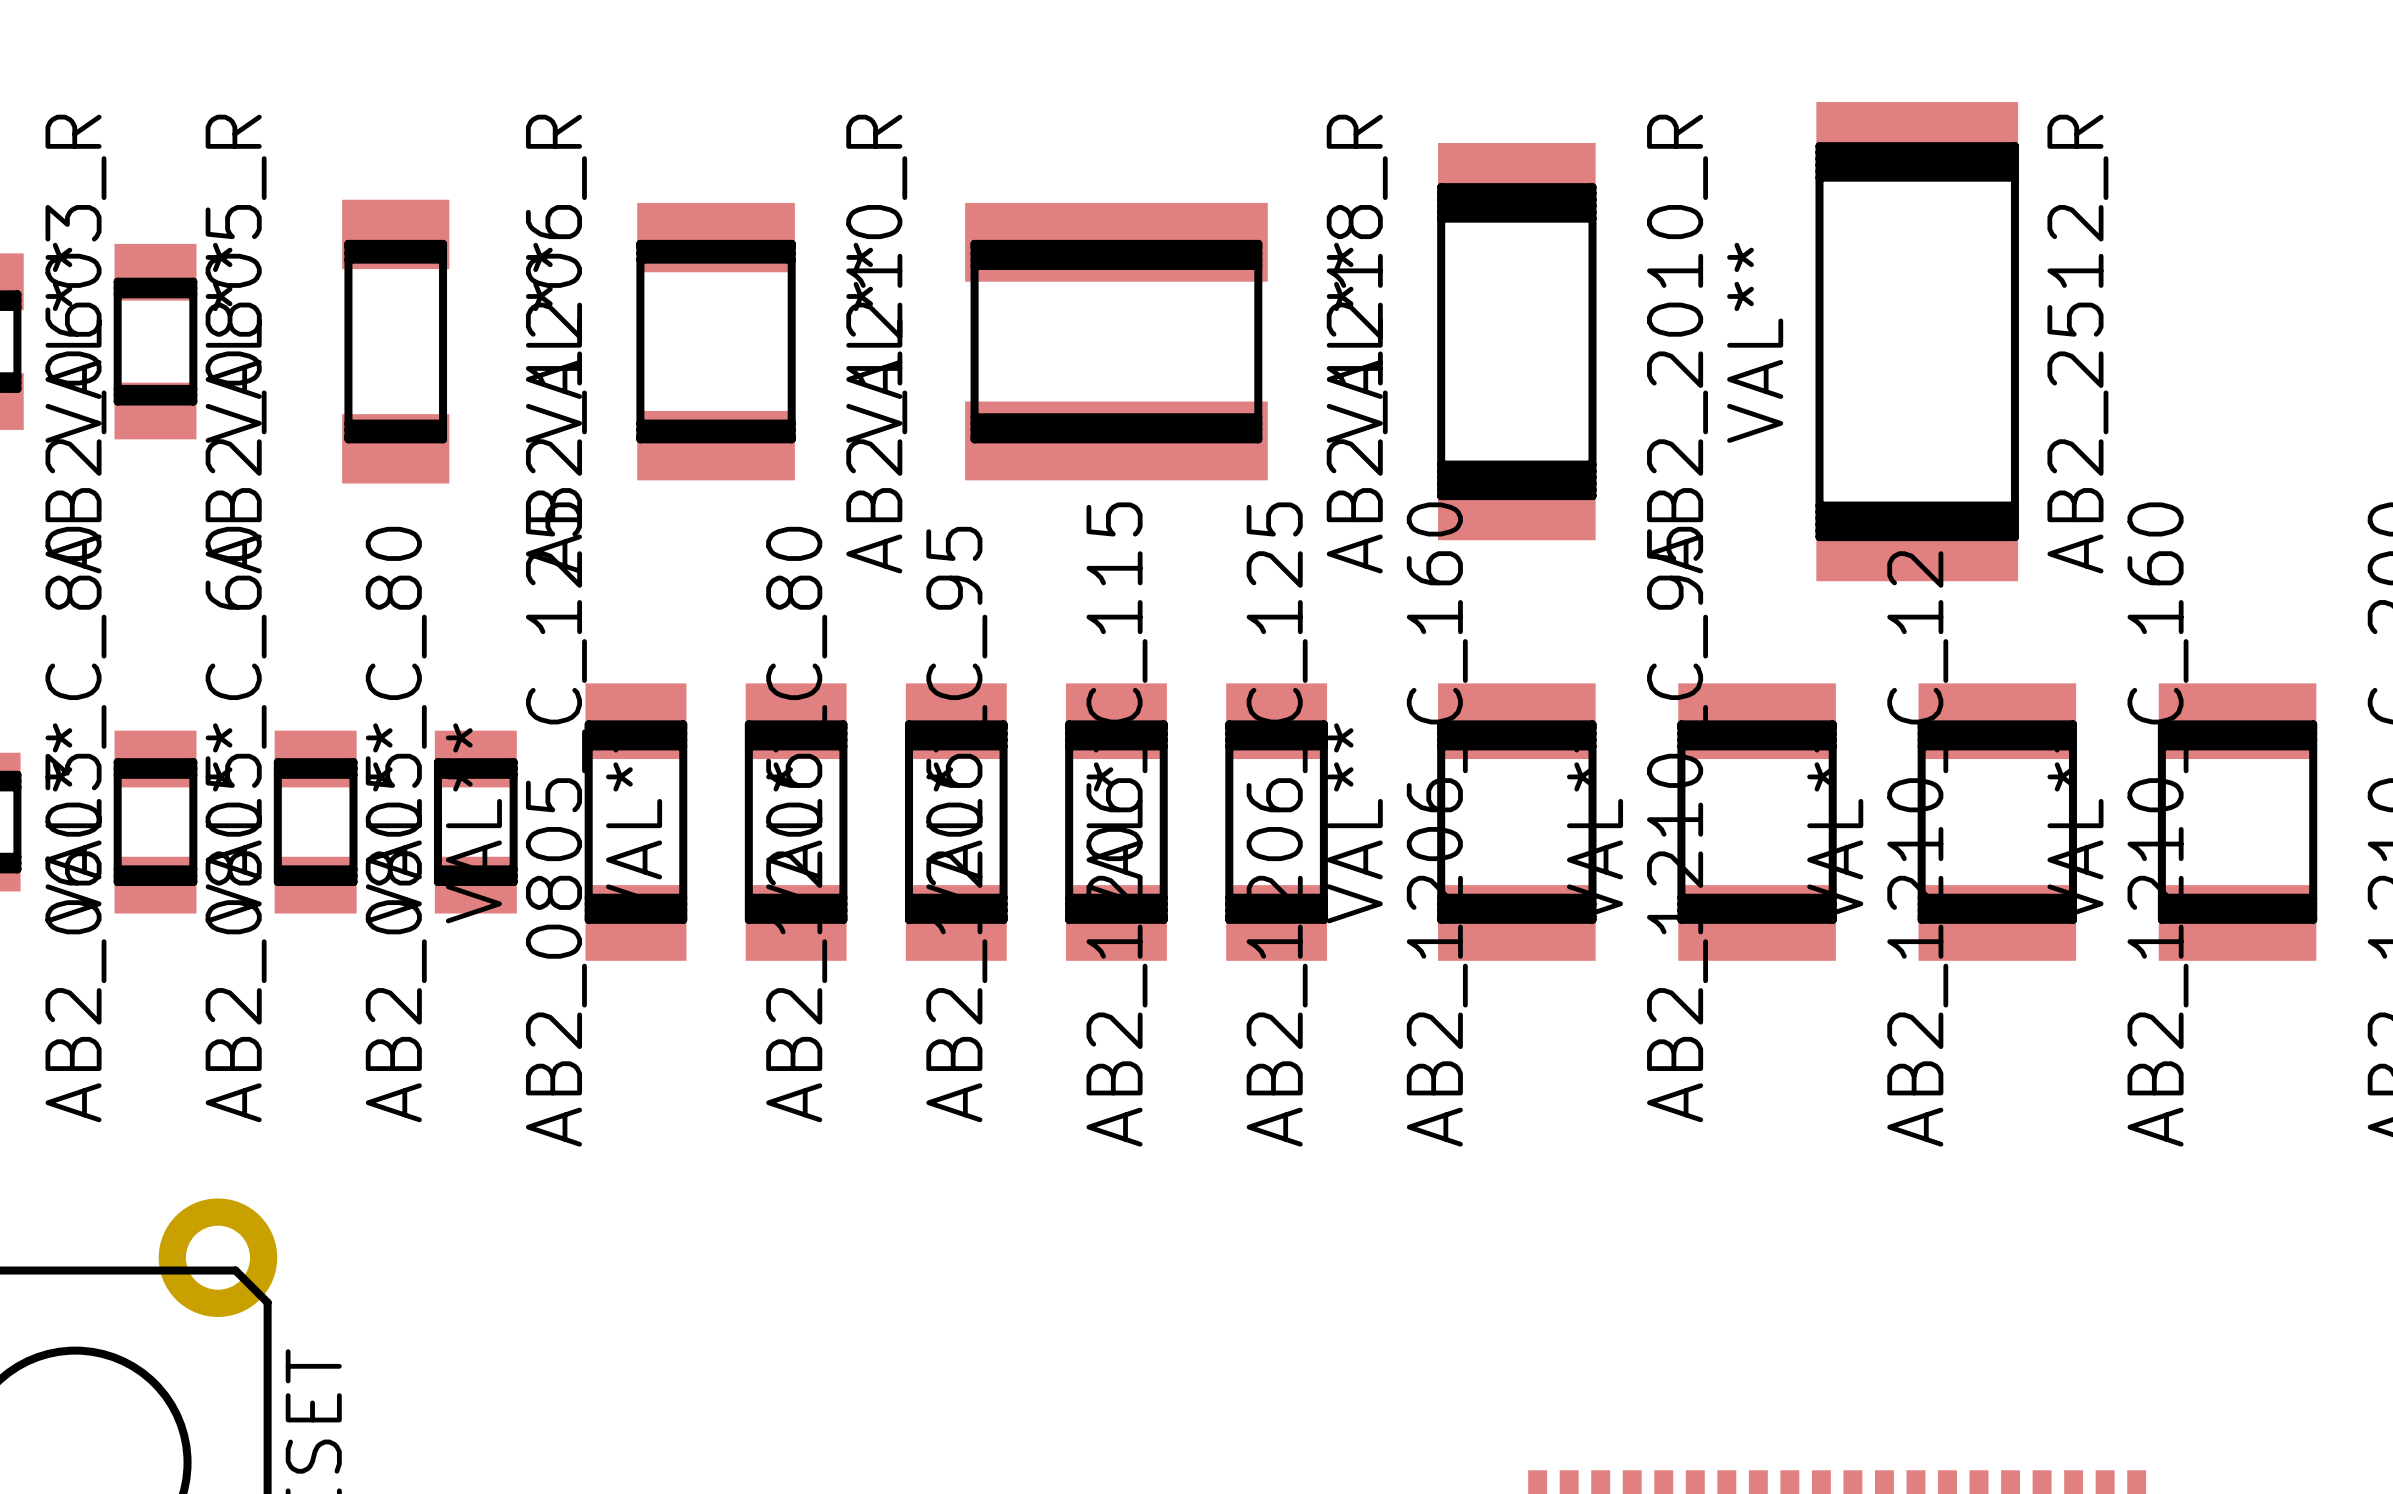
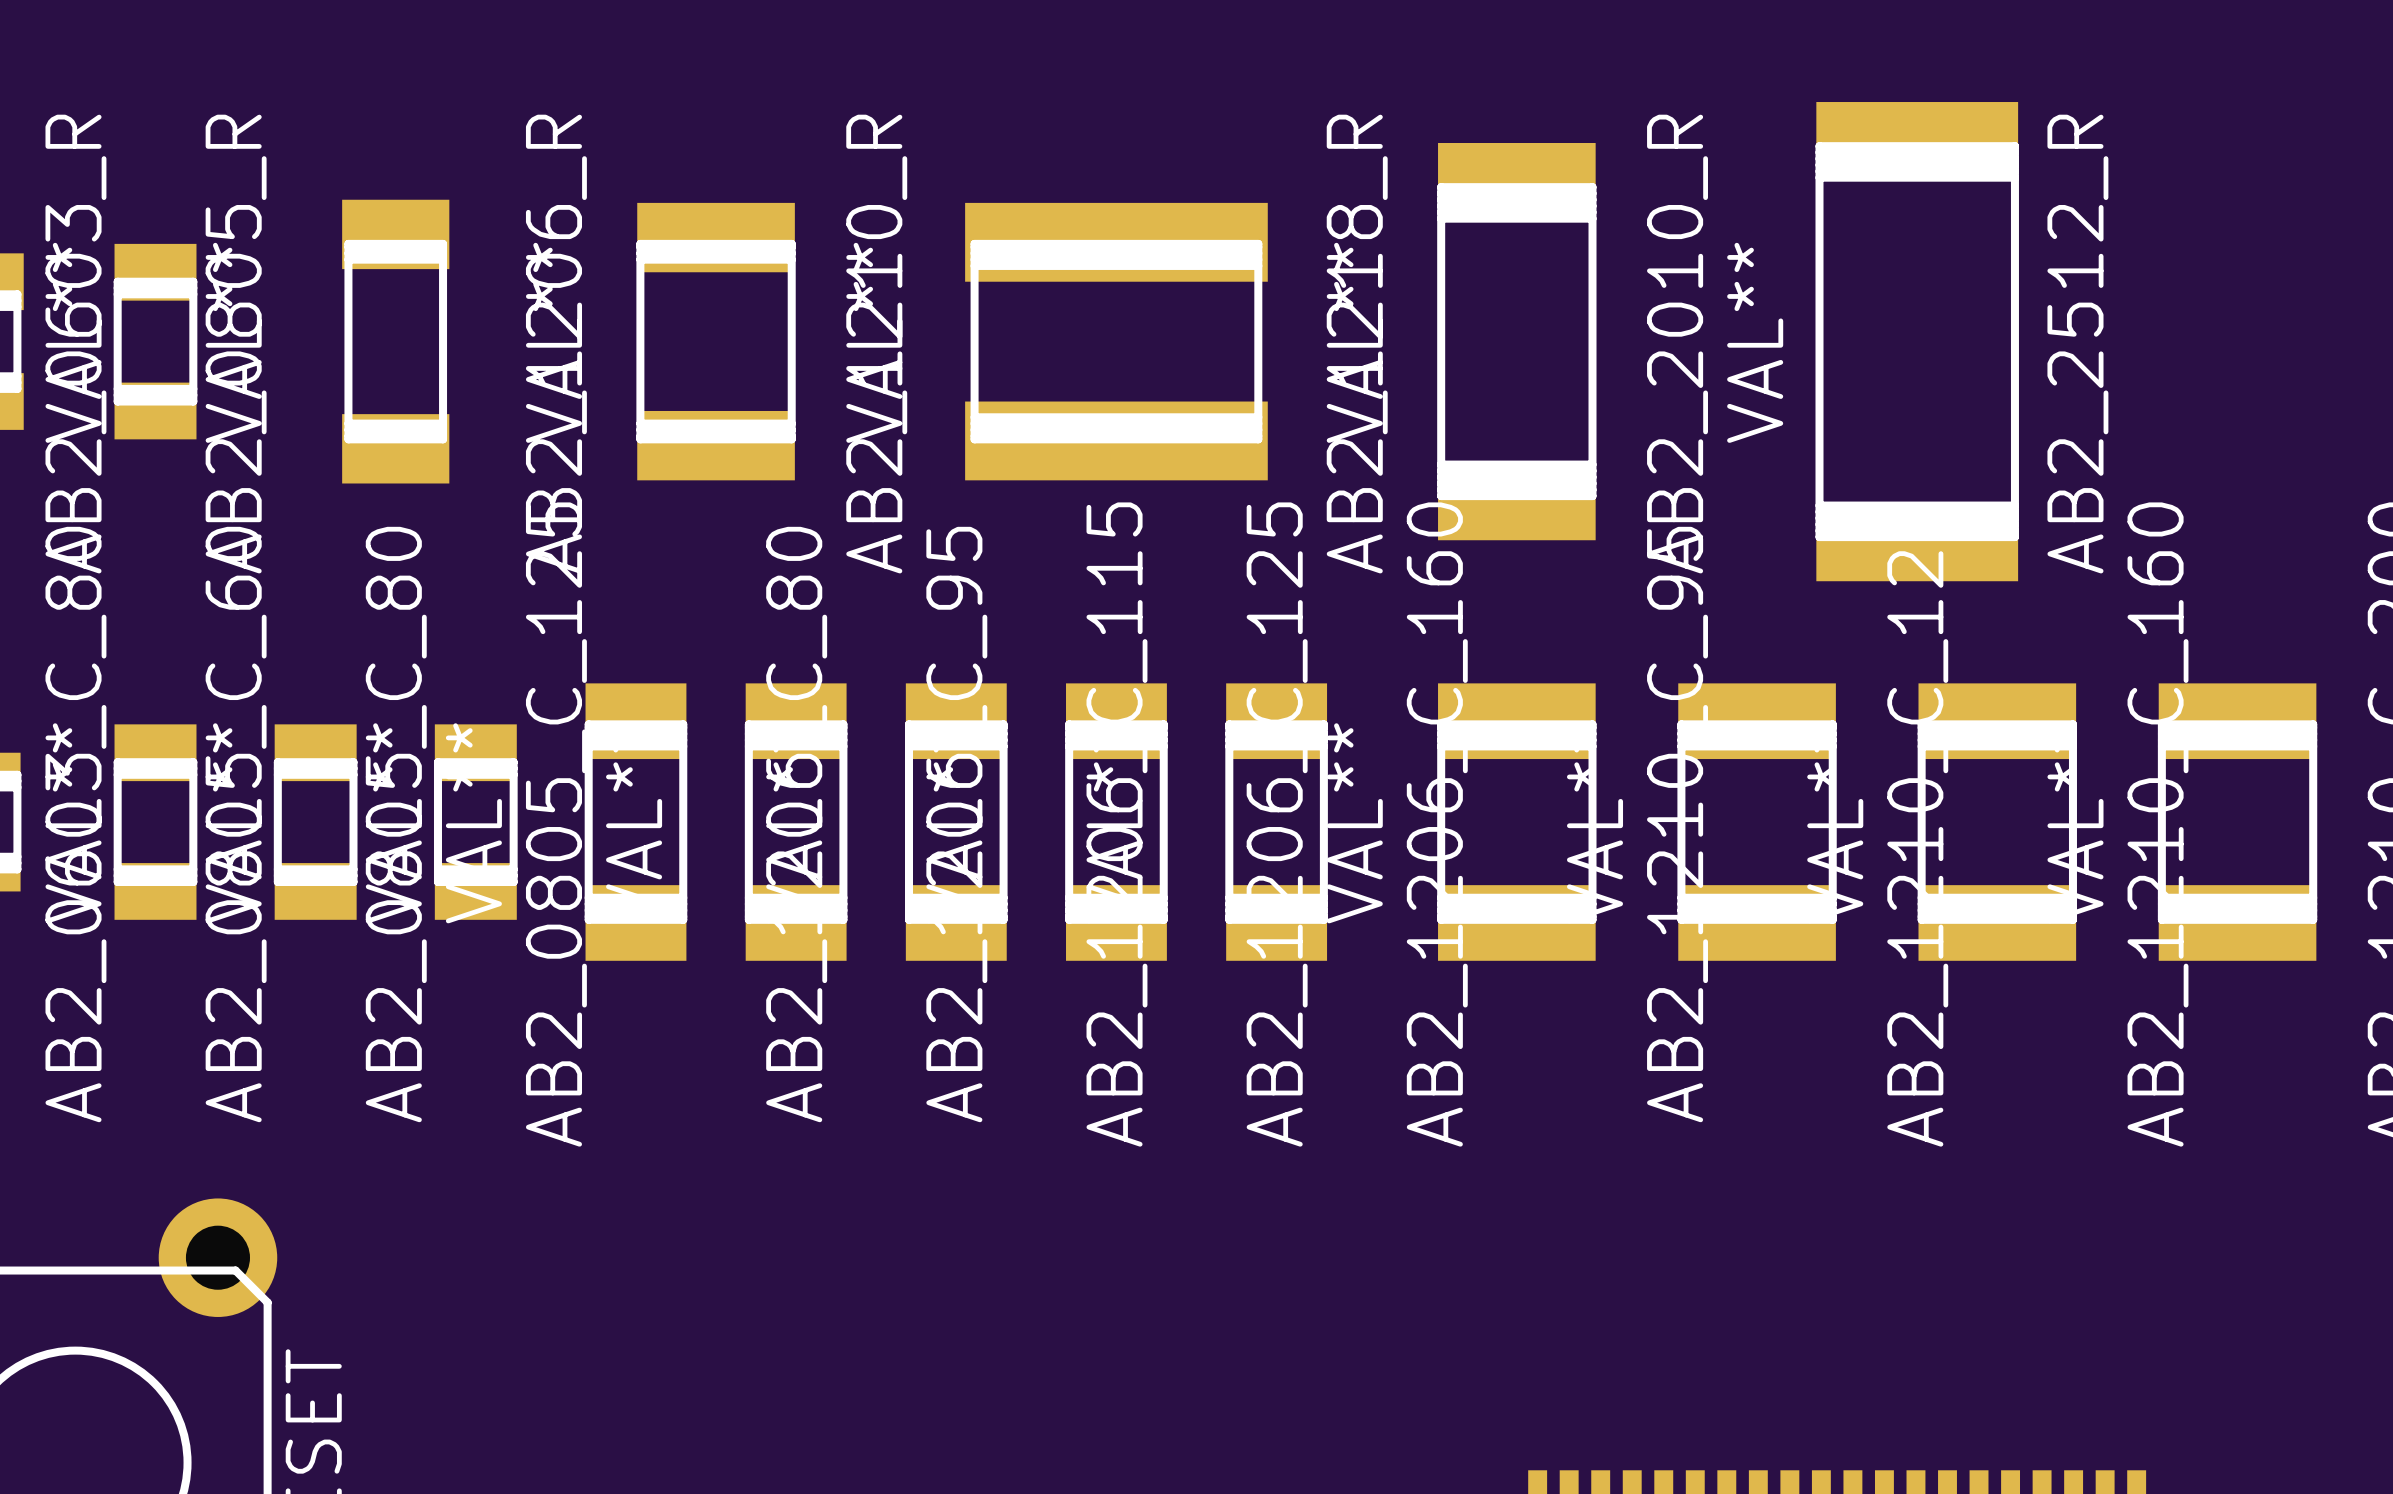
AB2_0805_C_60 footprint: [113, 730, 198, 914] -> [113, 724, 198, 920]
AB2_0805_C_80 footprint: [273, 730, 358, 914] -> [273, 724, 358, 920]
AB2_0805_C_125 footprint: [433, 730, 518, 914] -> [433, 724, 518, 920]

